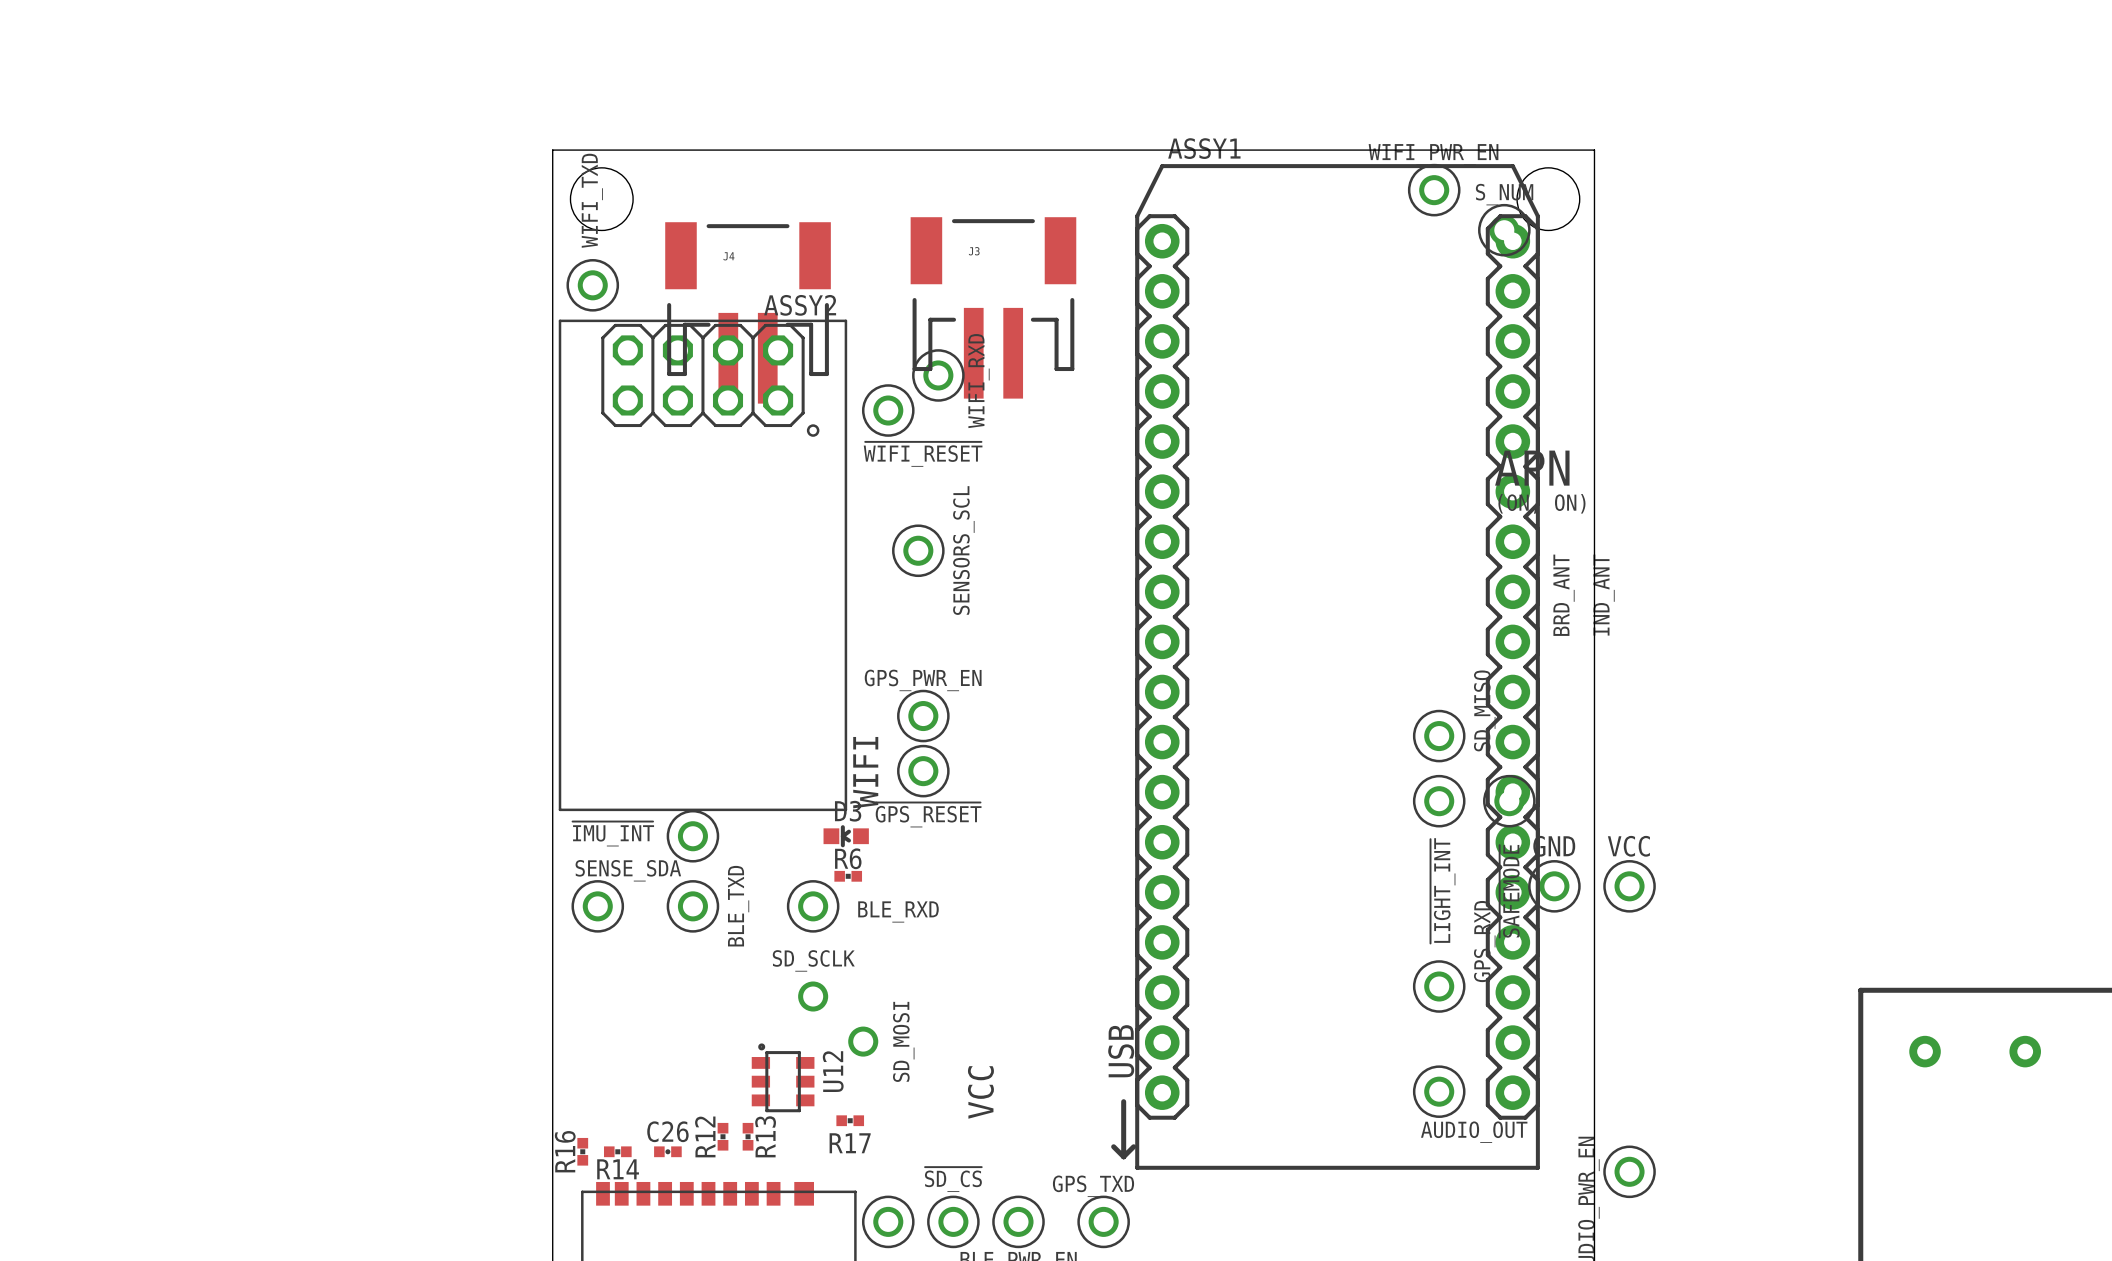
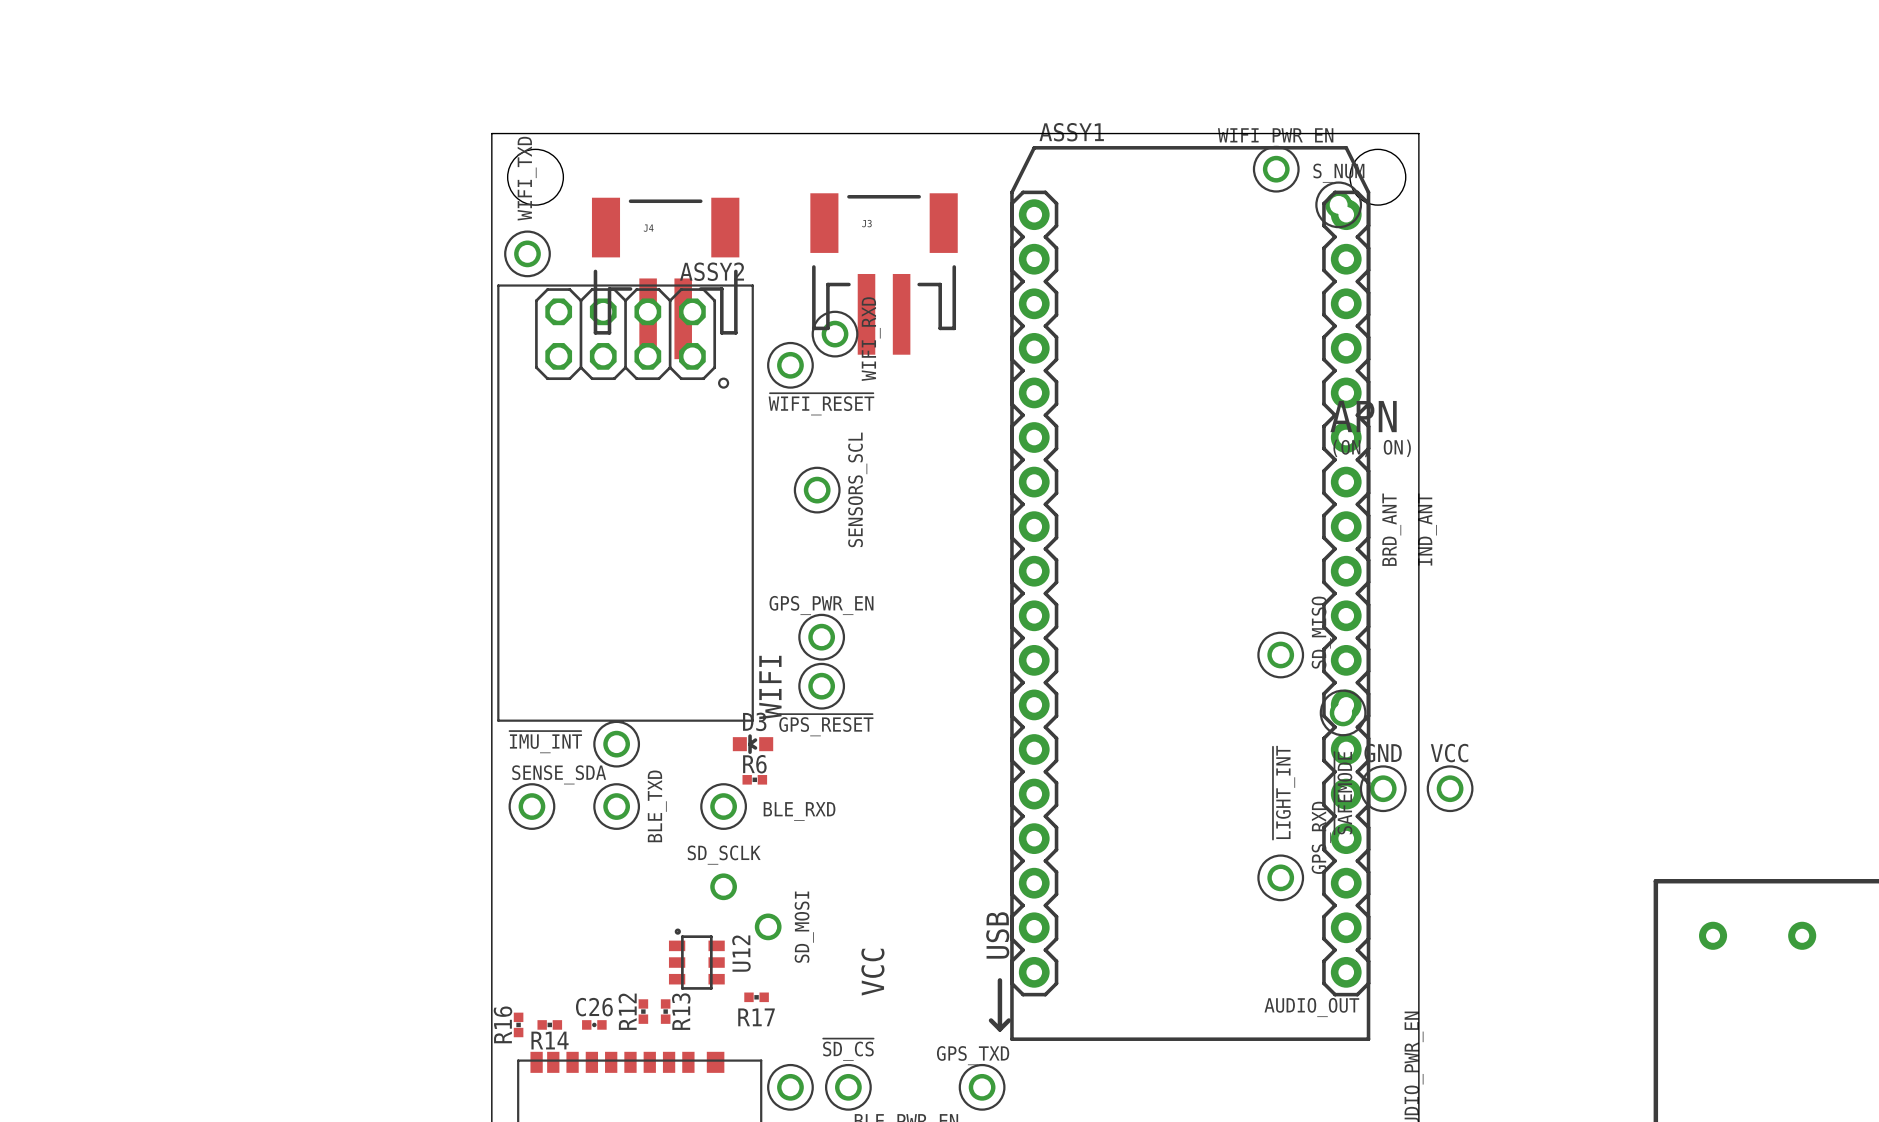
part: (1439, 801) -> none
part: (1439, 1091) -> none
part: (1629, 1171) -> none
part: (1018, 1221) -> none

